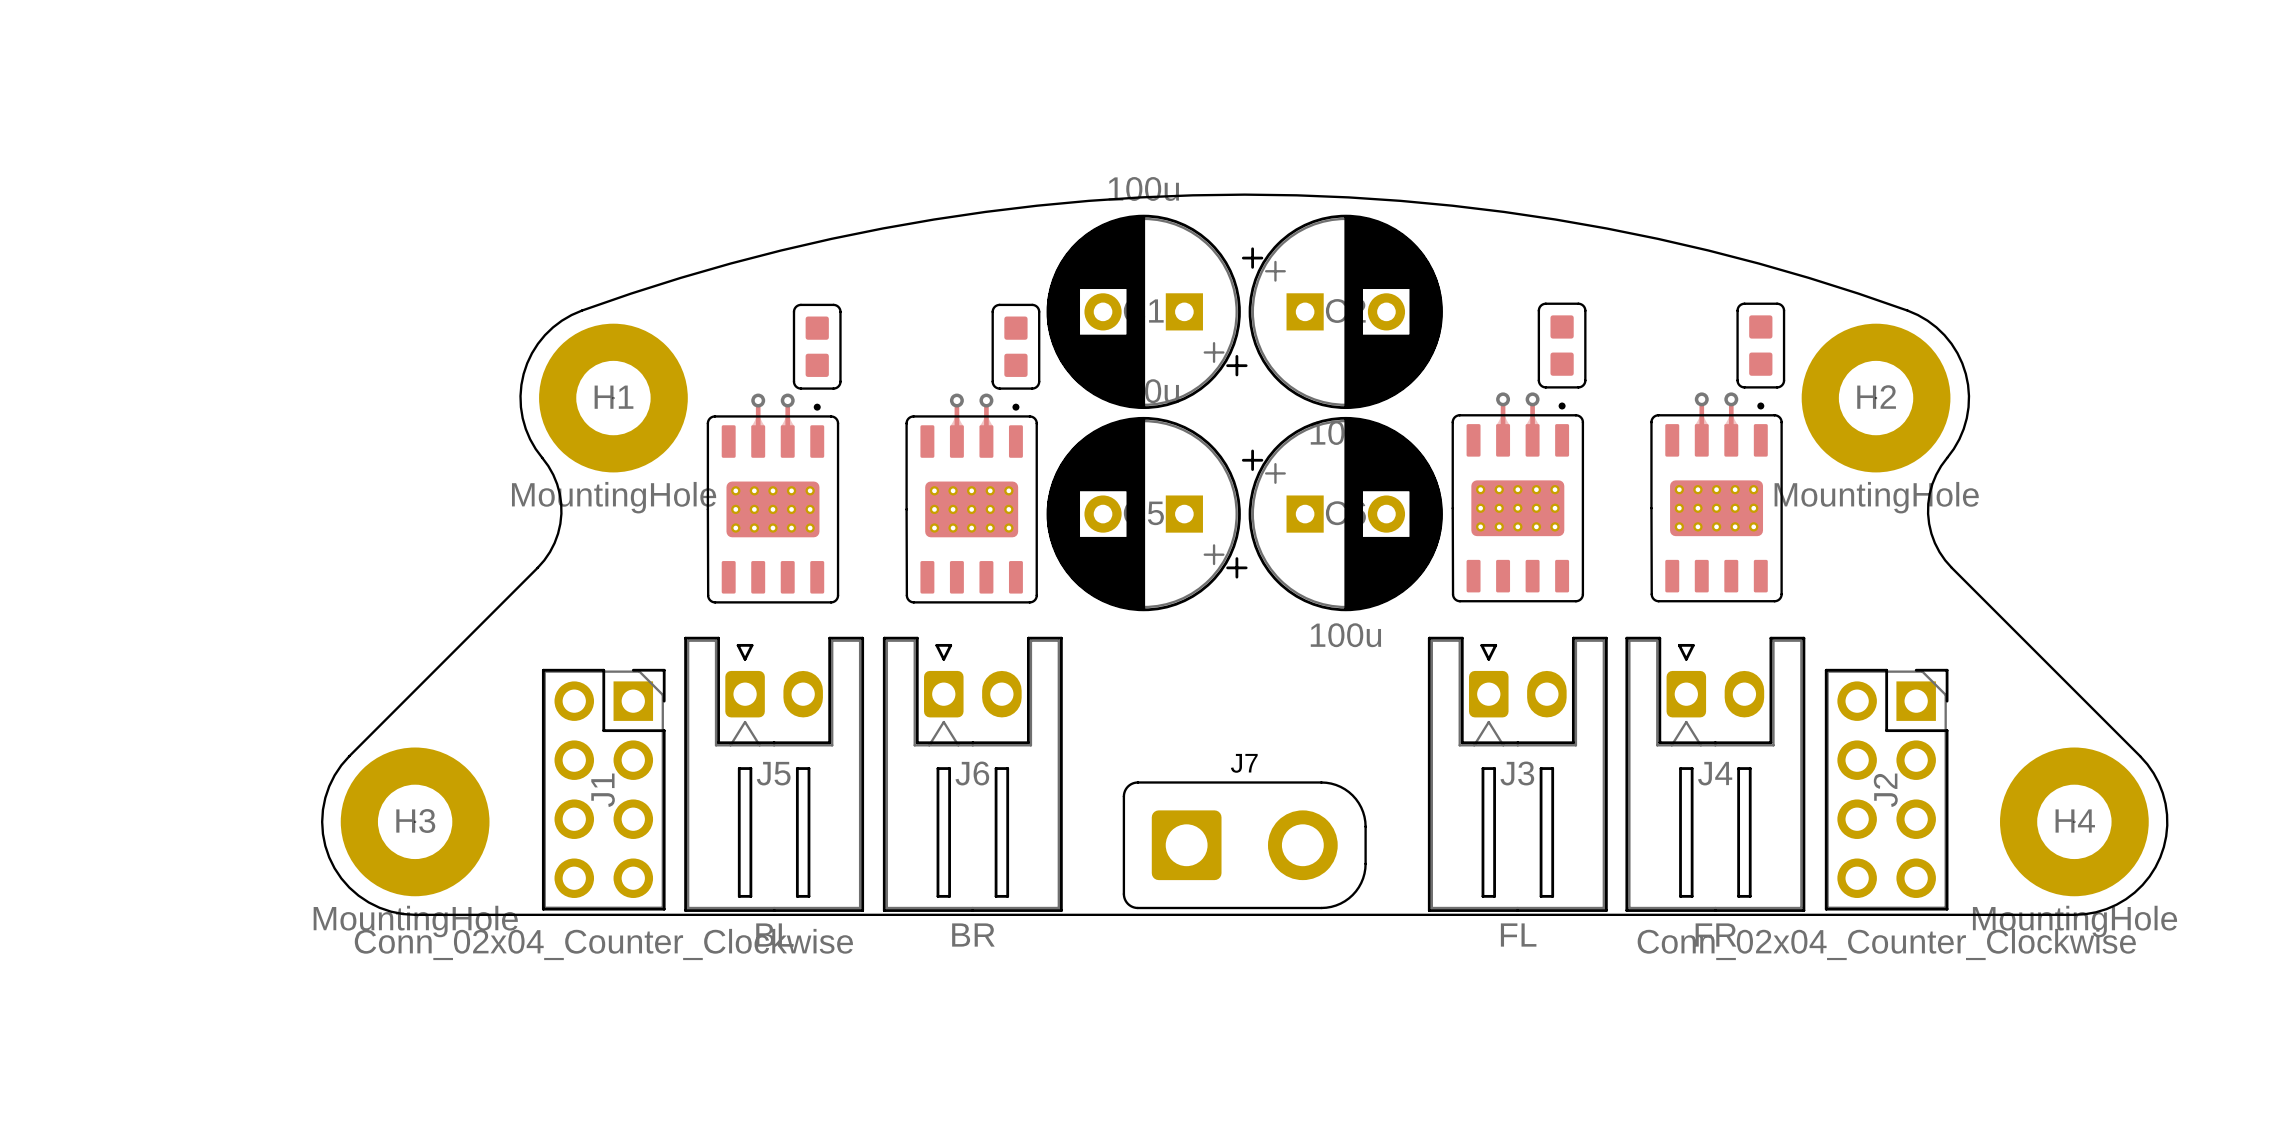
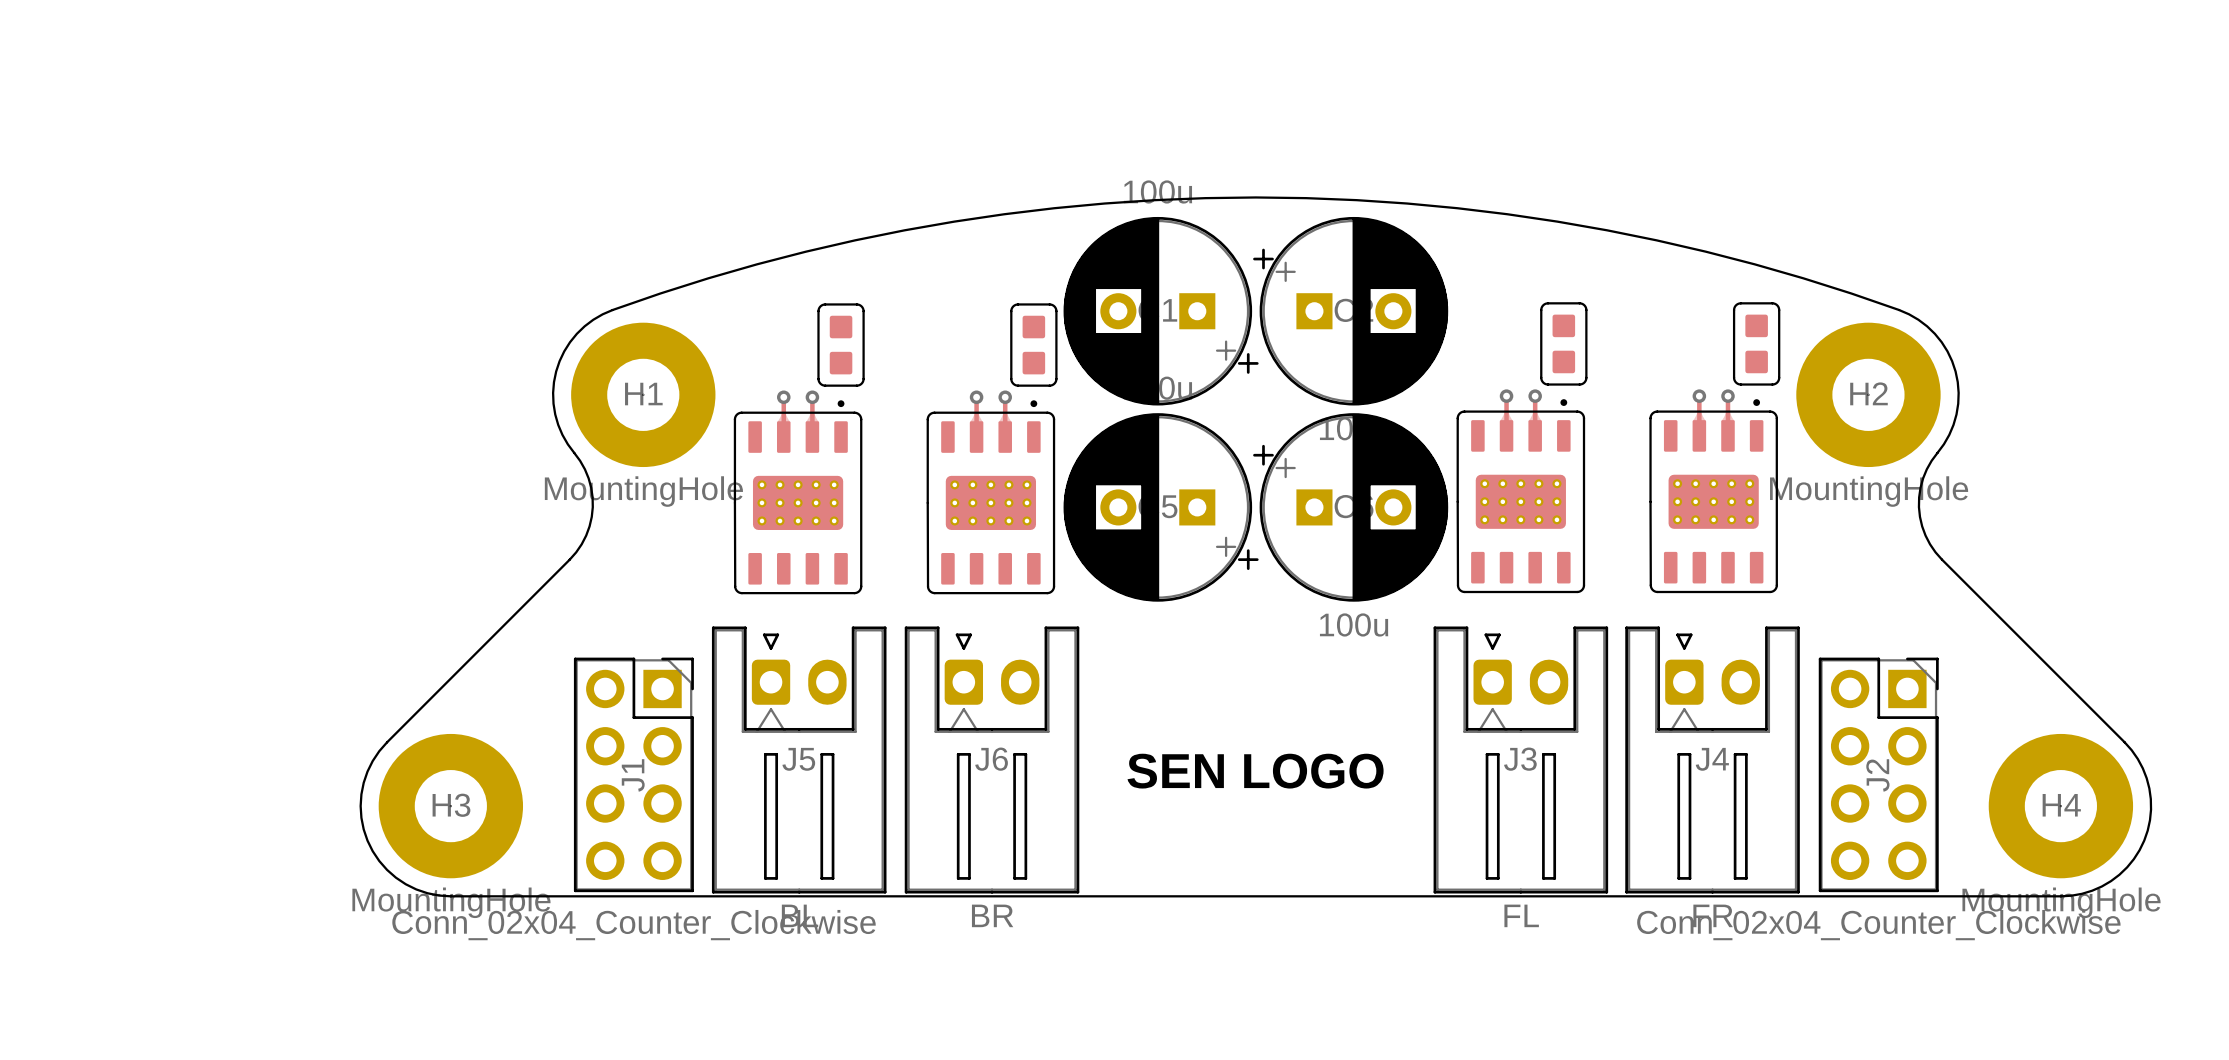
text: none -> SEN LOGO (1255, 771)
J7: (1244, 845) -> none

